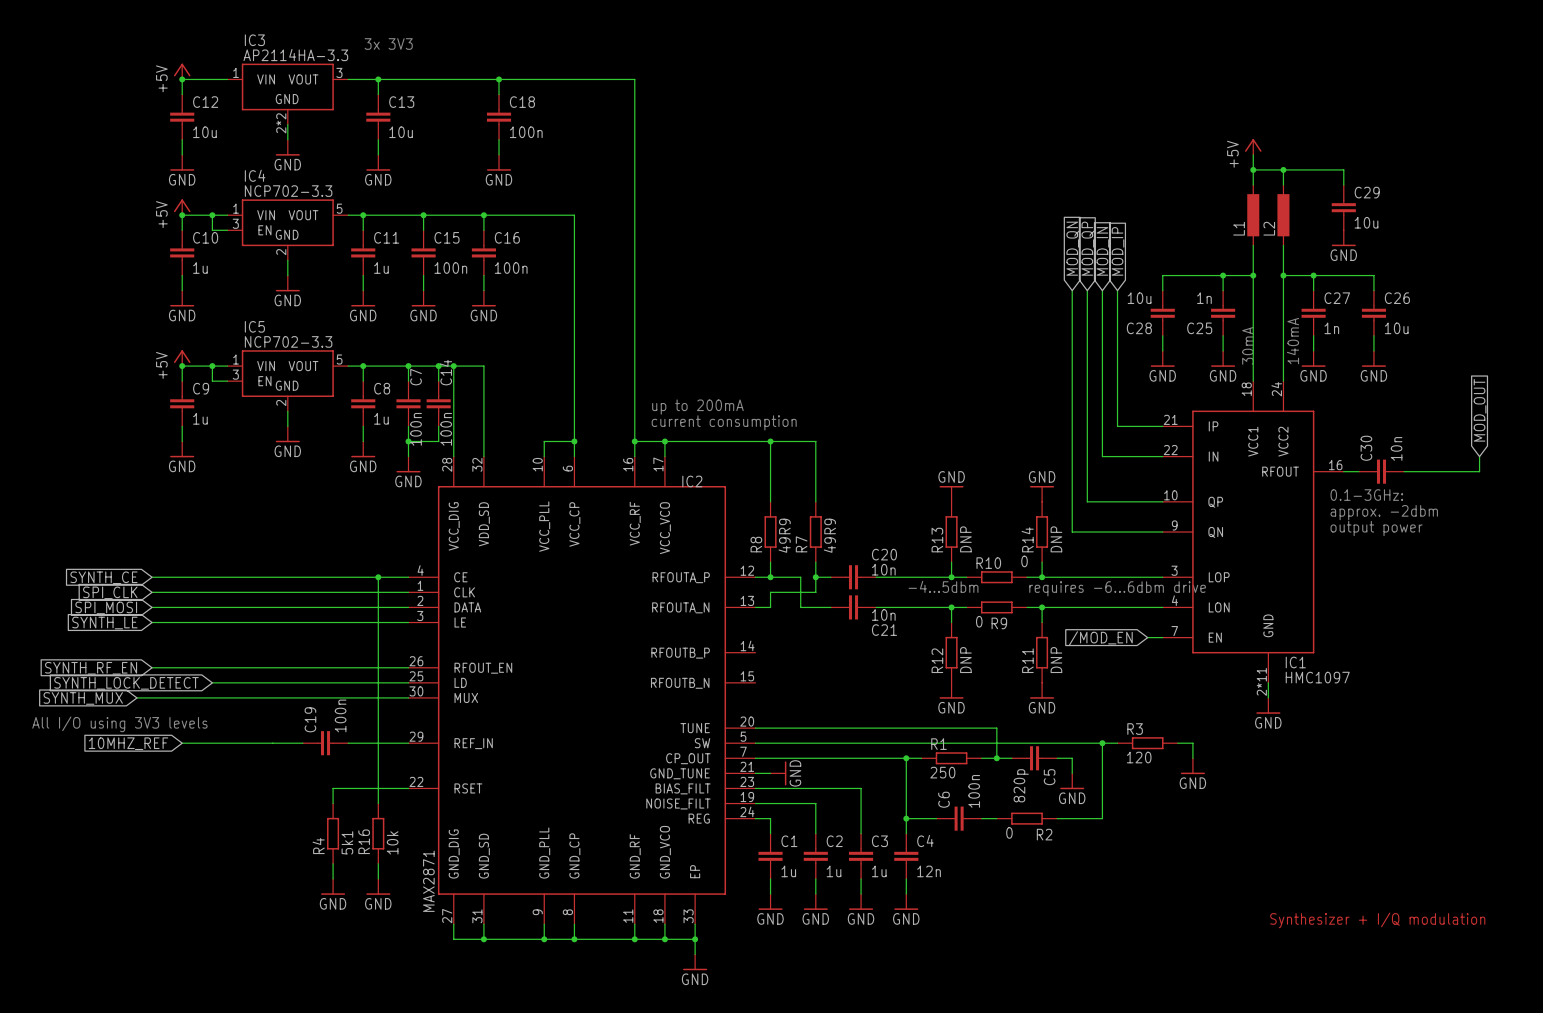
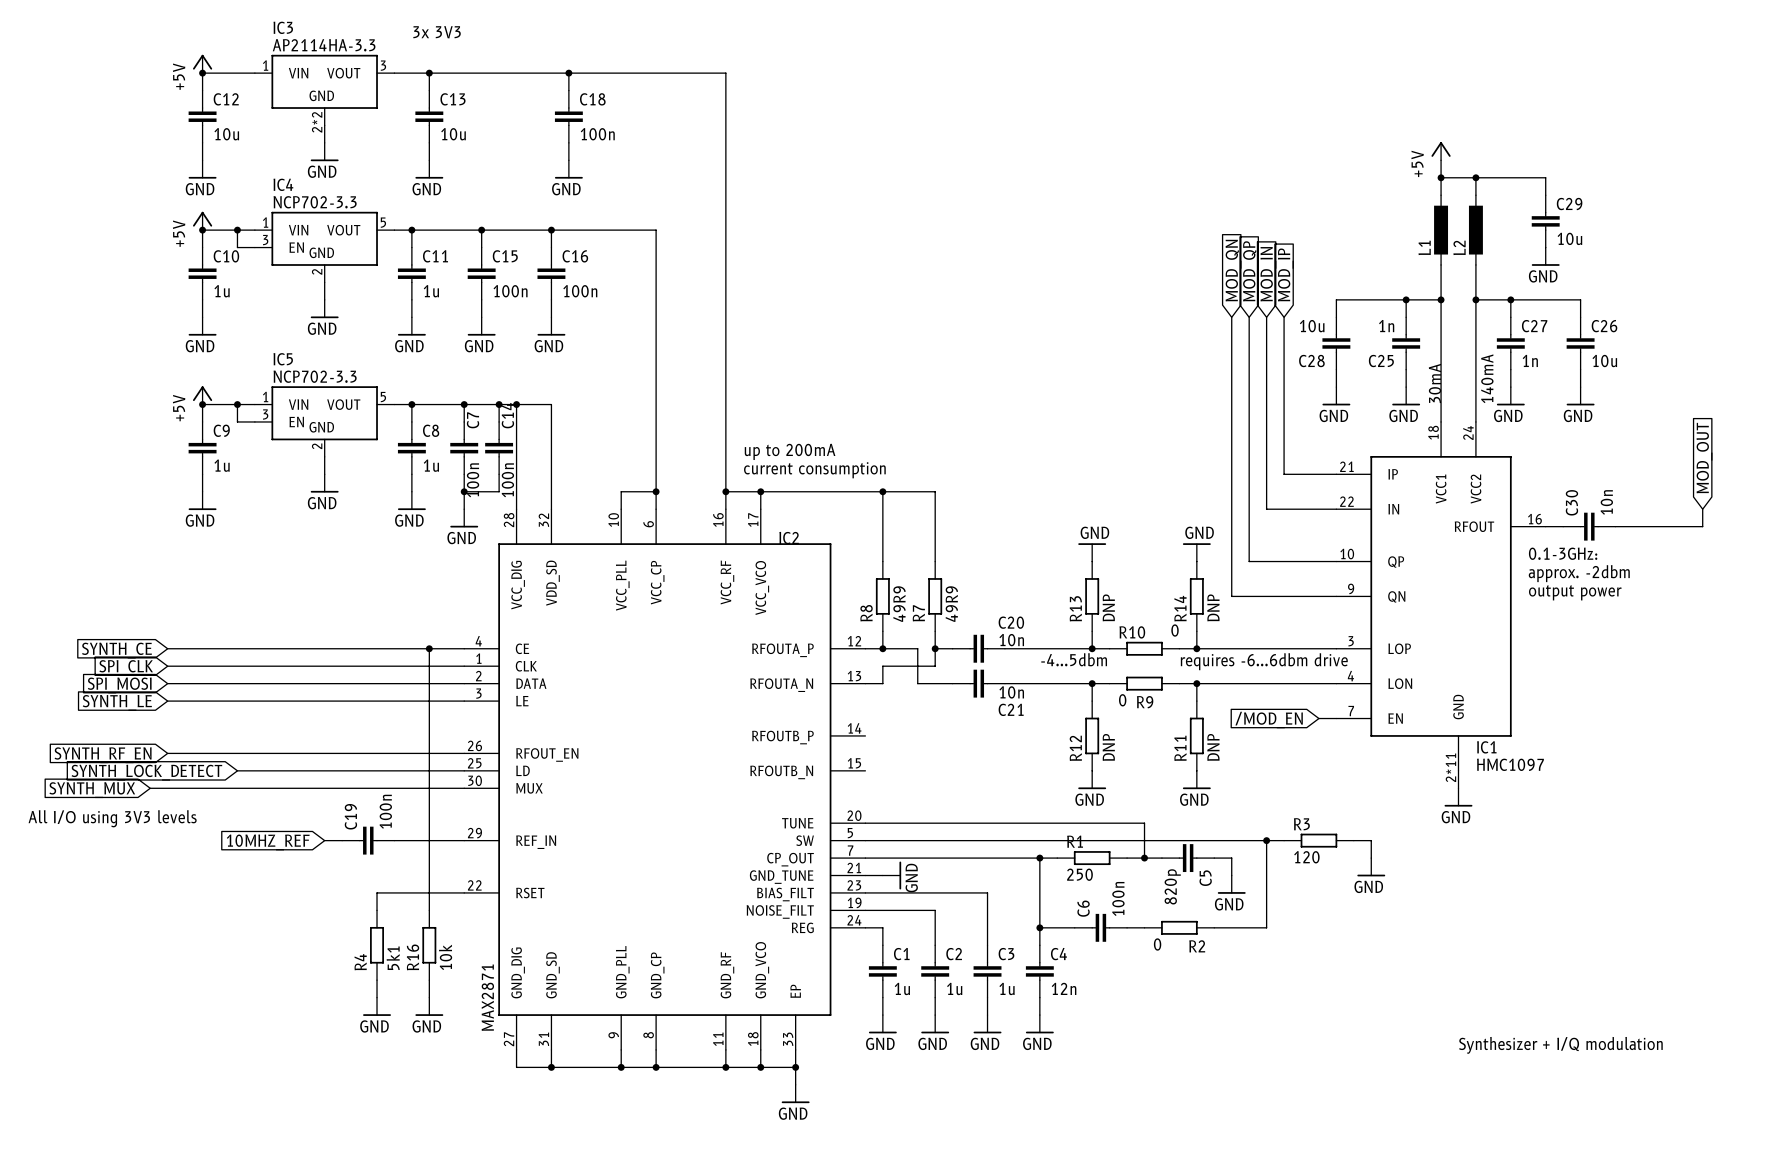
global label position: 10MHZ_REF (128, 743) -> 10MHZ_REF (268, 842)
wire: (182, 743) (287, 743) -> none

